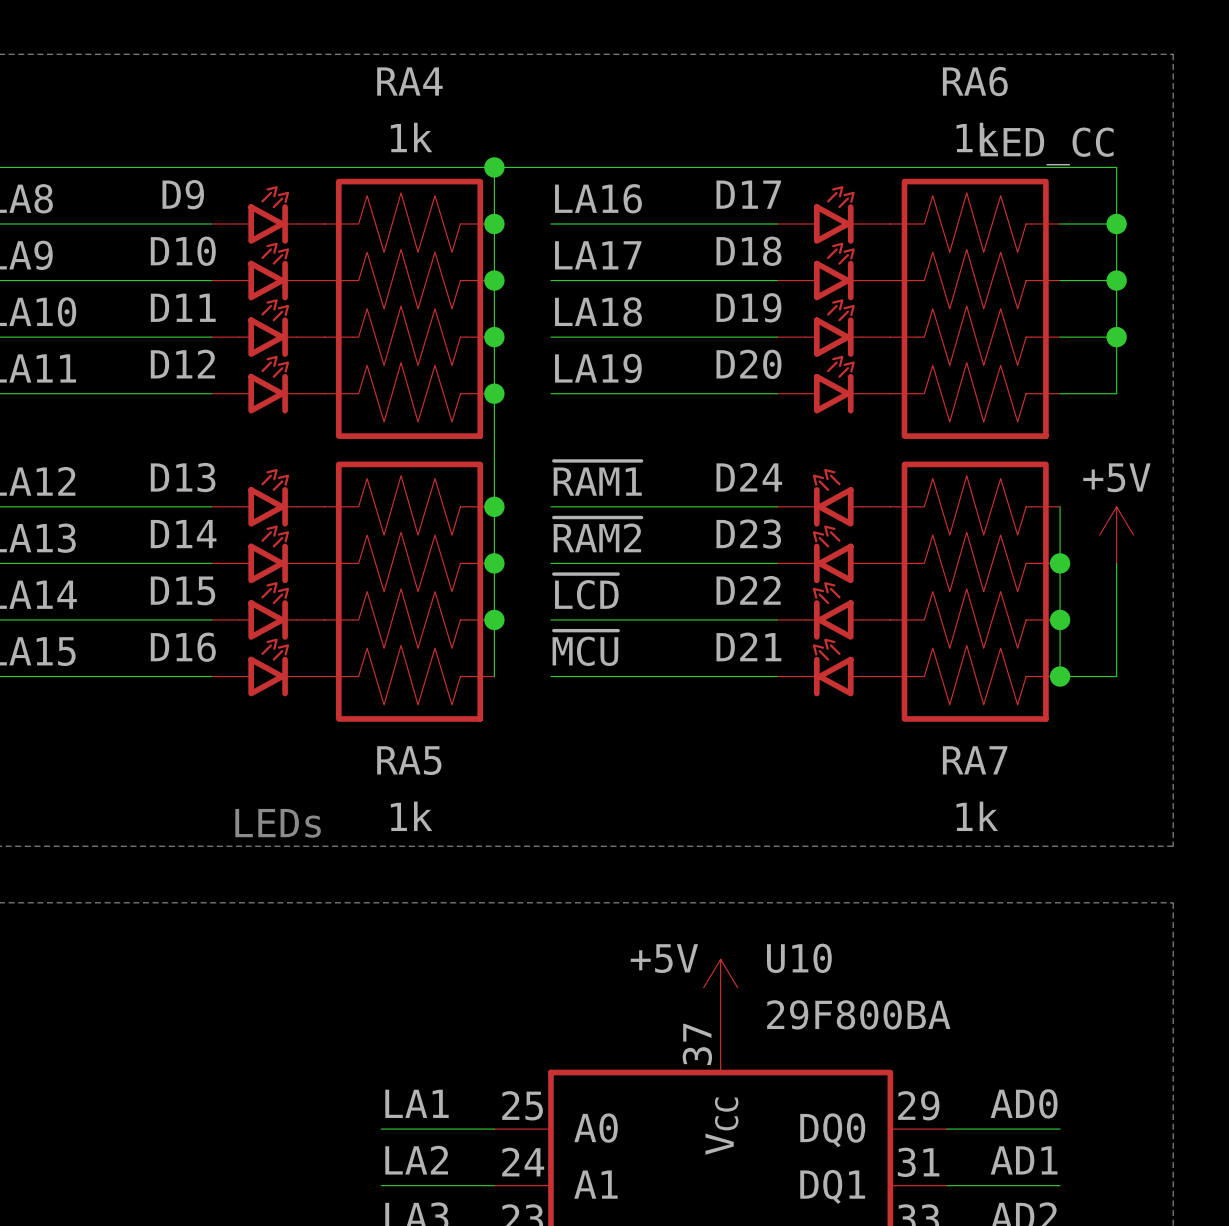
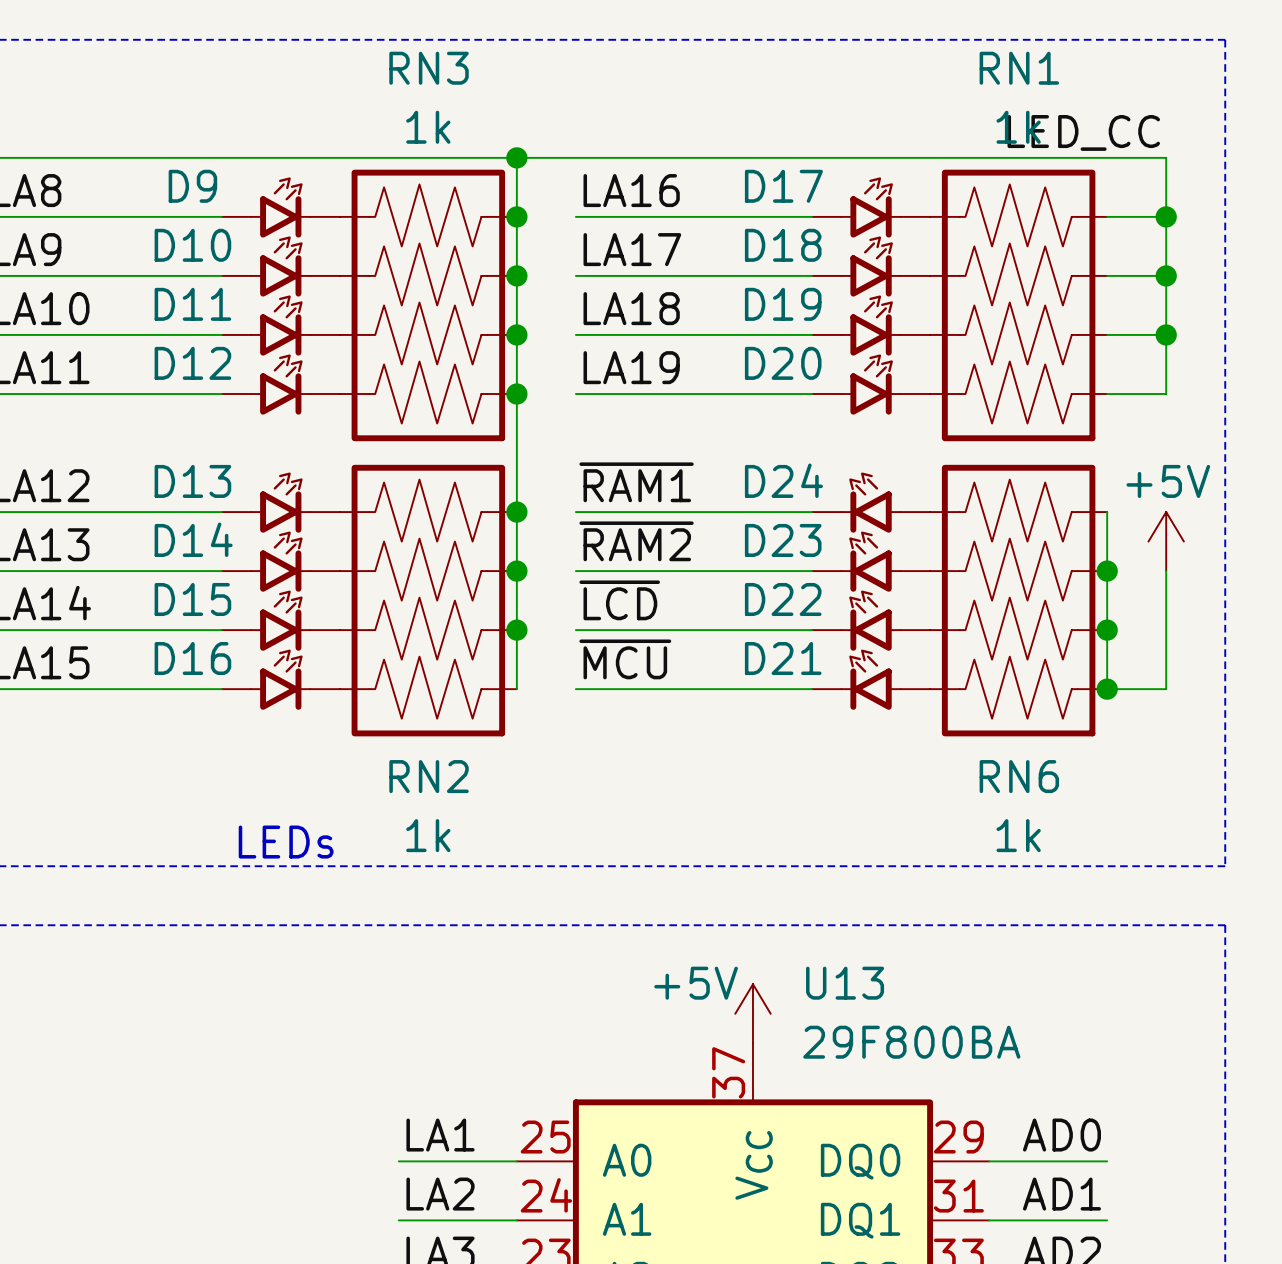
RA4 name: RA4 (409, 81) -> RN3 (429, 68)
RA6 name: RA6 (975, 81) -> RN1 (1019, 68)
RA5 name: RA5 (409, 760) -> RN2 (429, 776)
RA7 name: RA7 (975, 760) -> RN6 (1019, 776)
U10 name: U10 (799, 958) -> U13 (845, 983)

